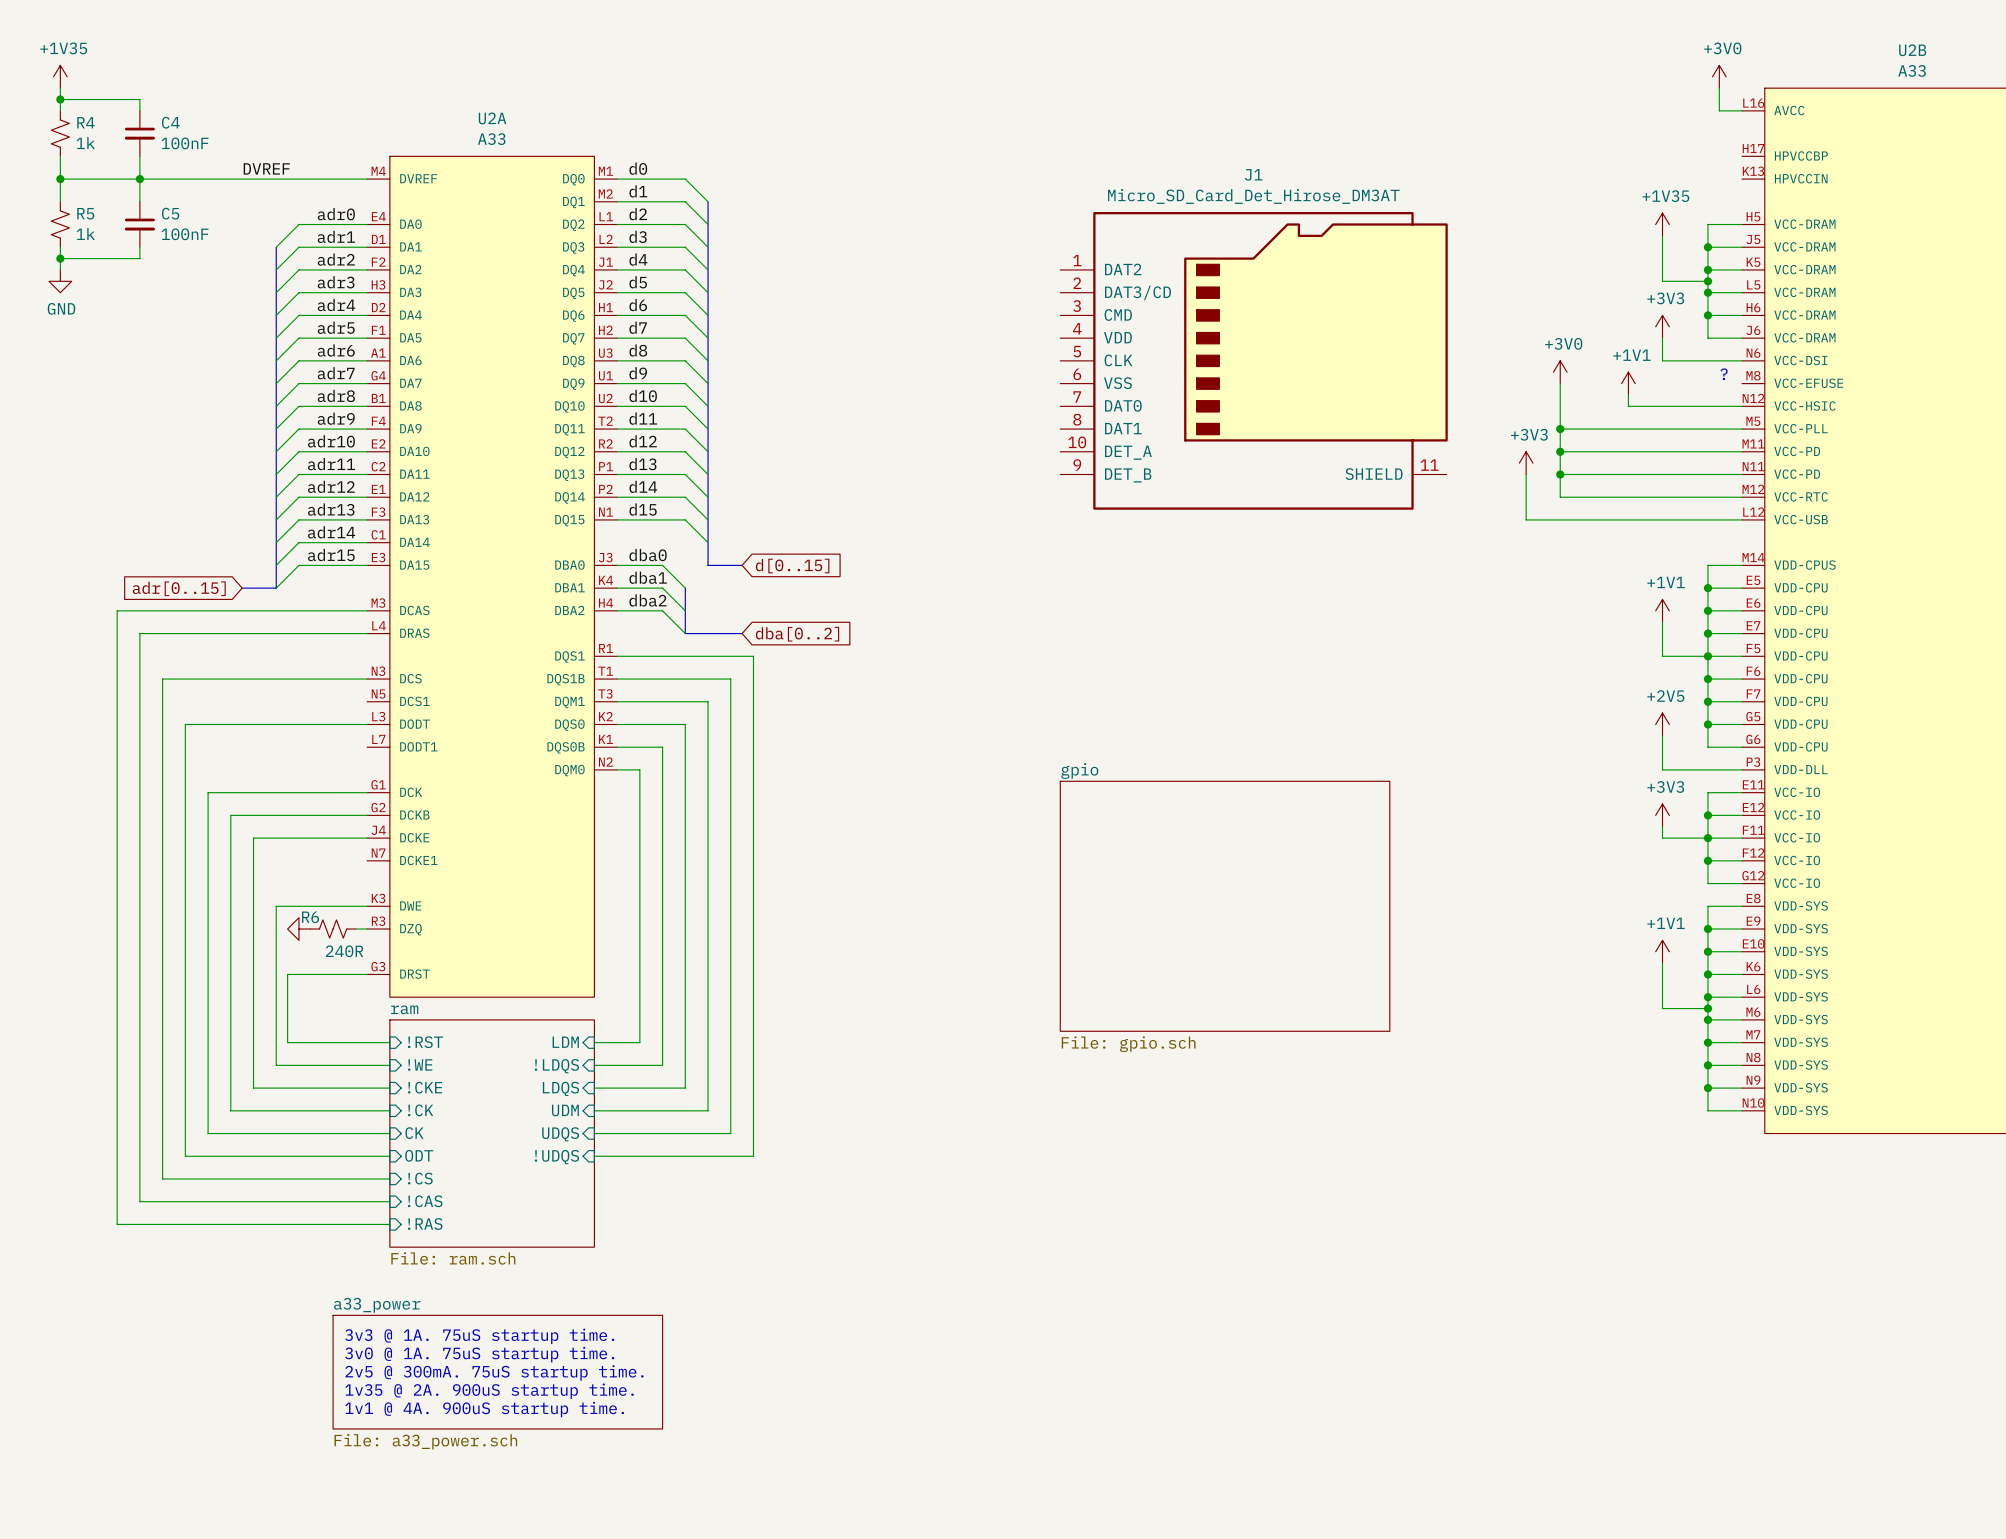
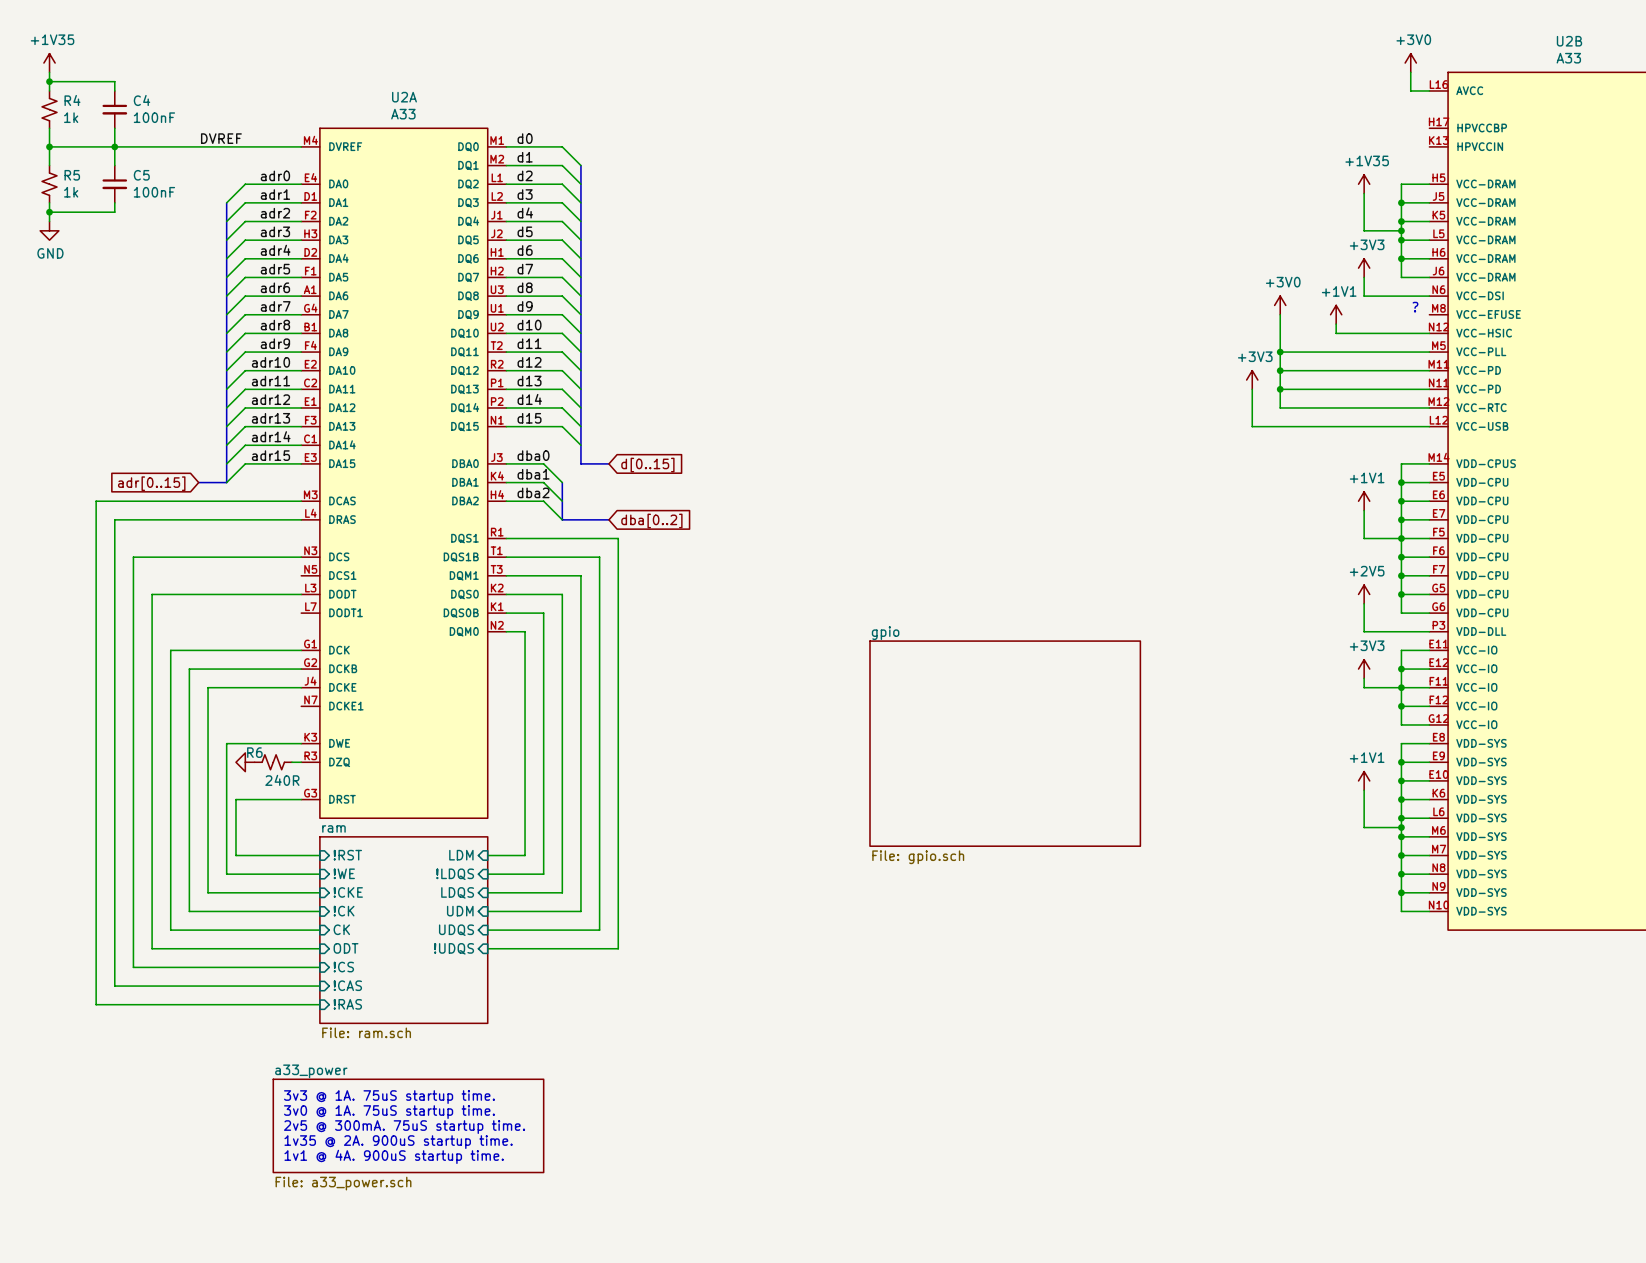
J1: Micro_SD_Card_Det_Hirose_DM3AT (1254, 360) -> none

